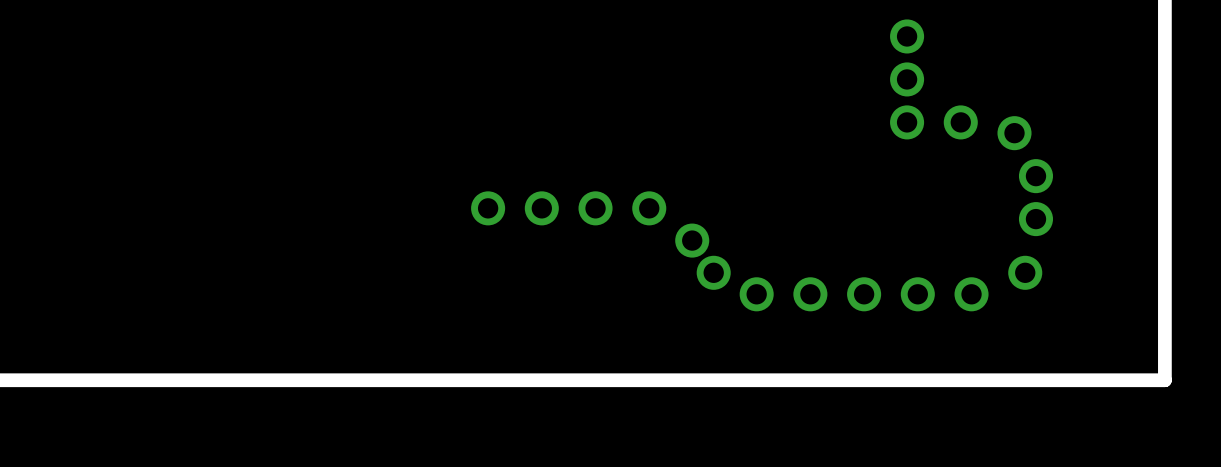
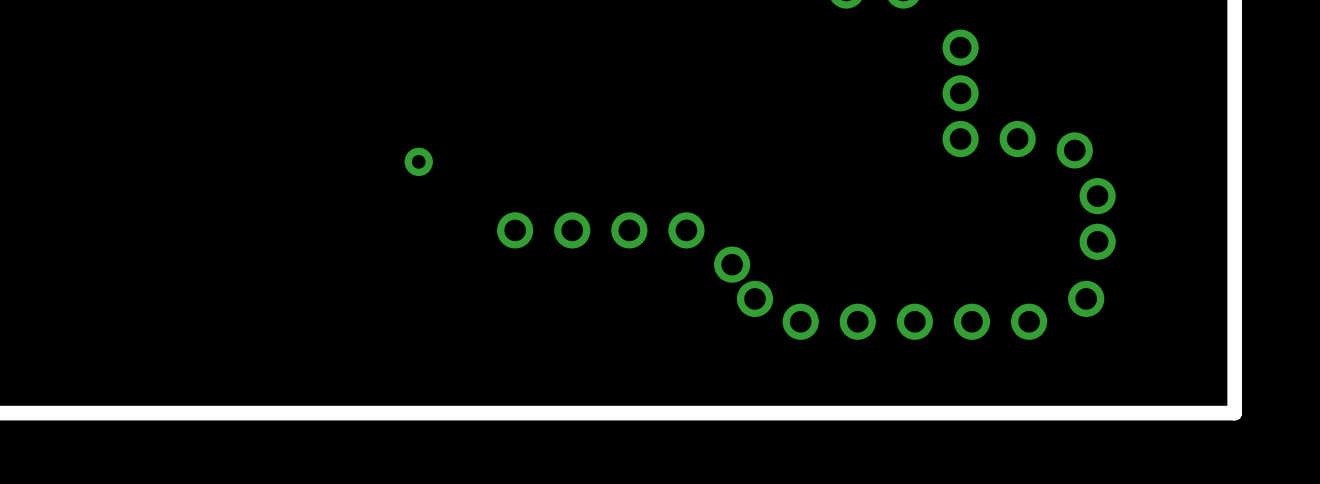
via: none -> (418, 161)

